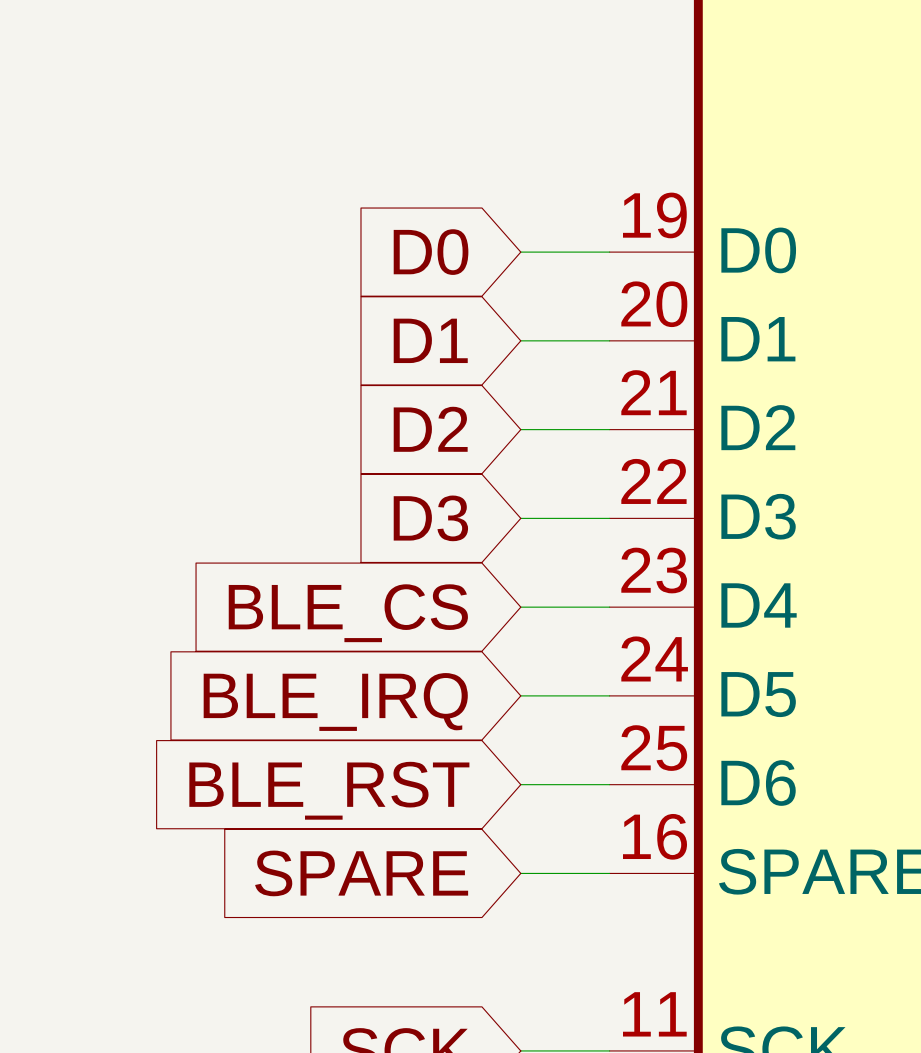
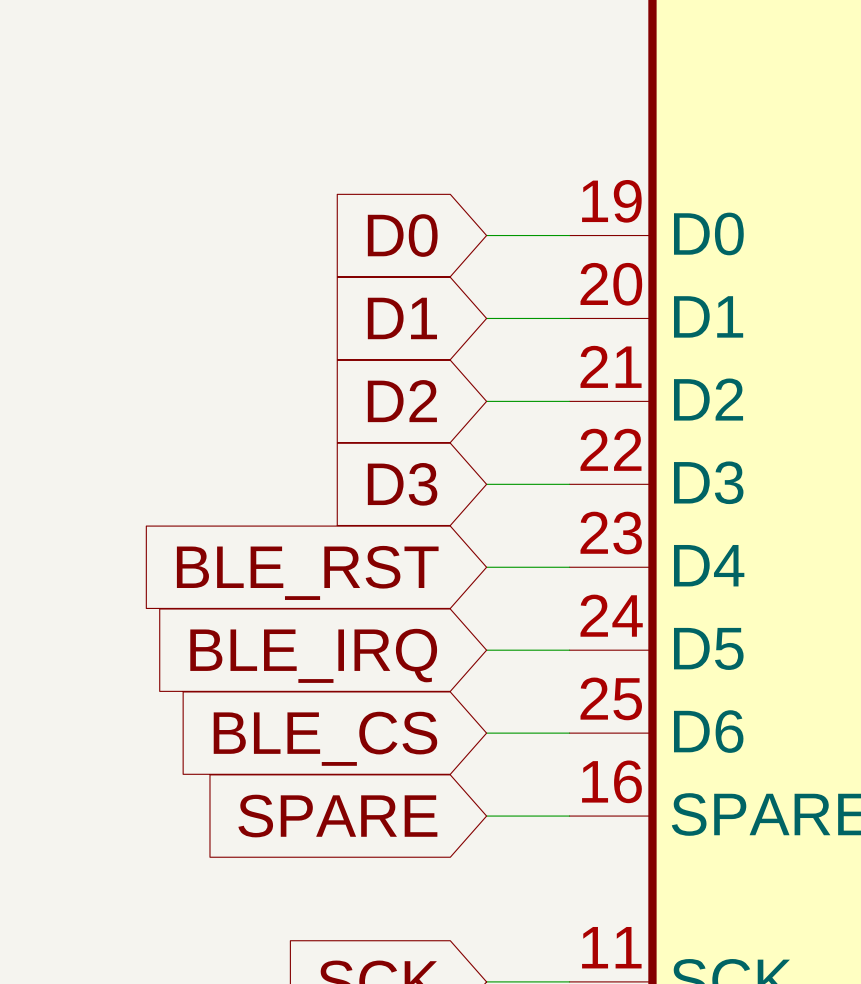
global label: BLE_CS (348, 613) -> BLE_RST (307, 572)
global label: BLE_RST (329, 790) -> BLE_CS (325, 738)

